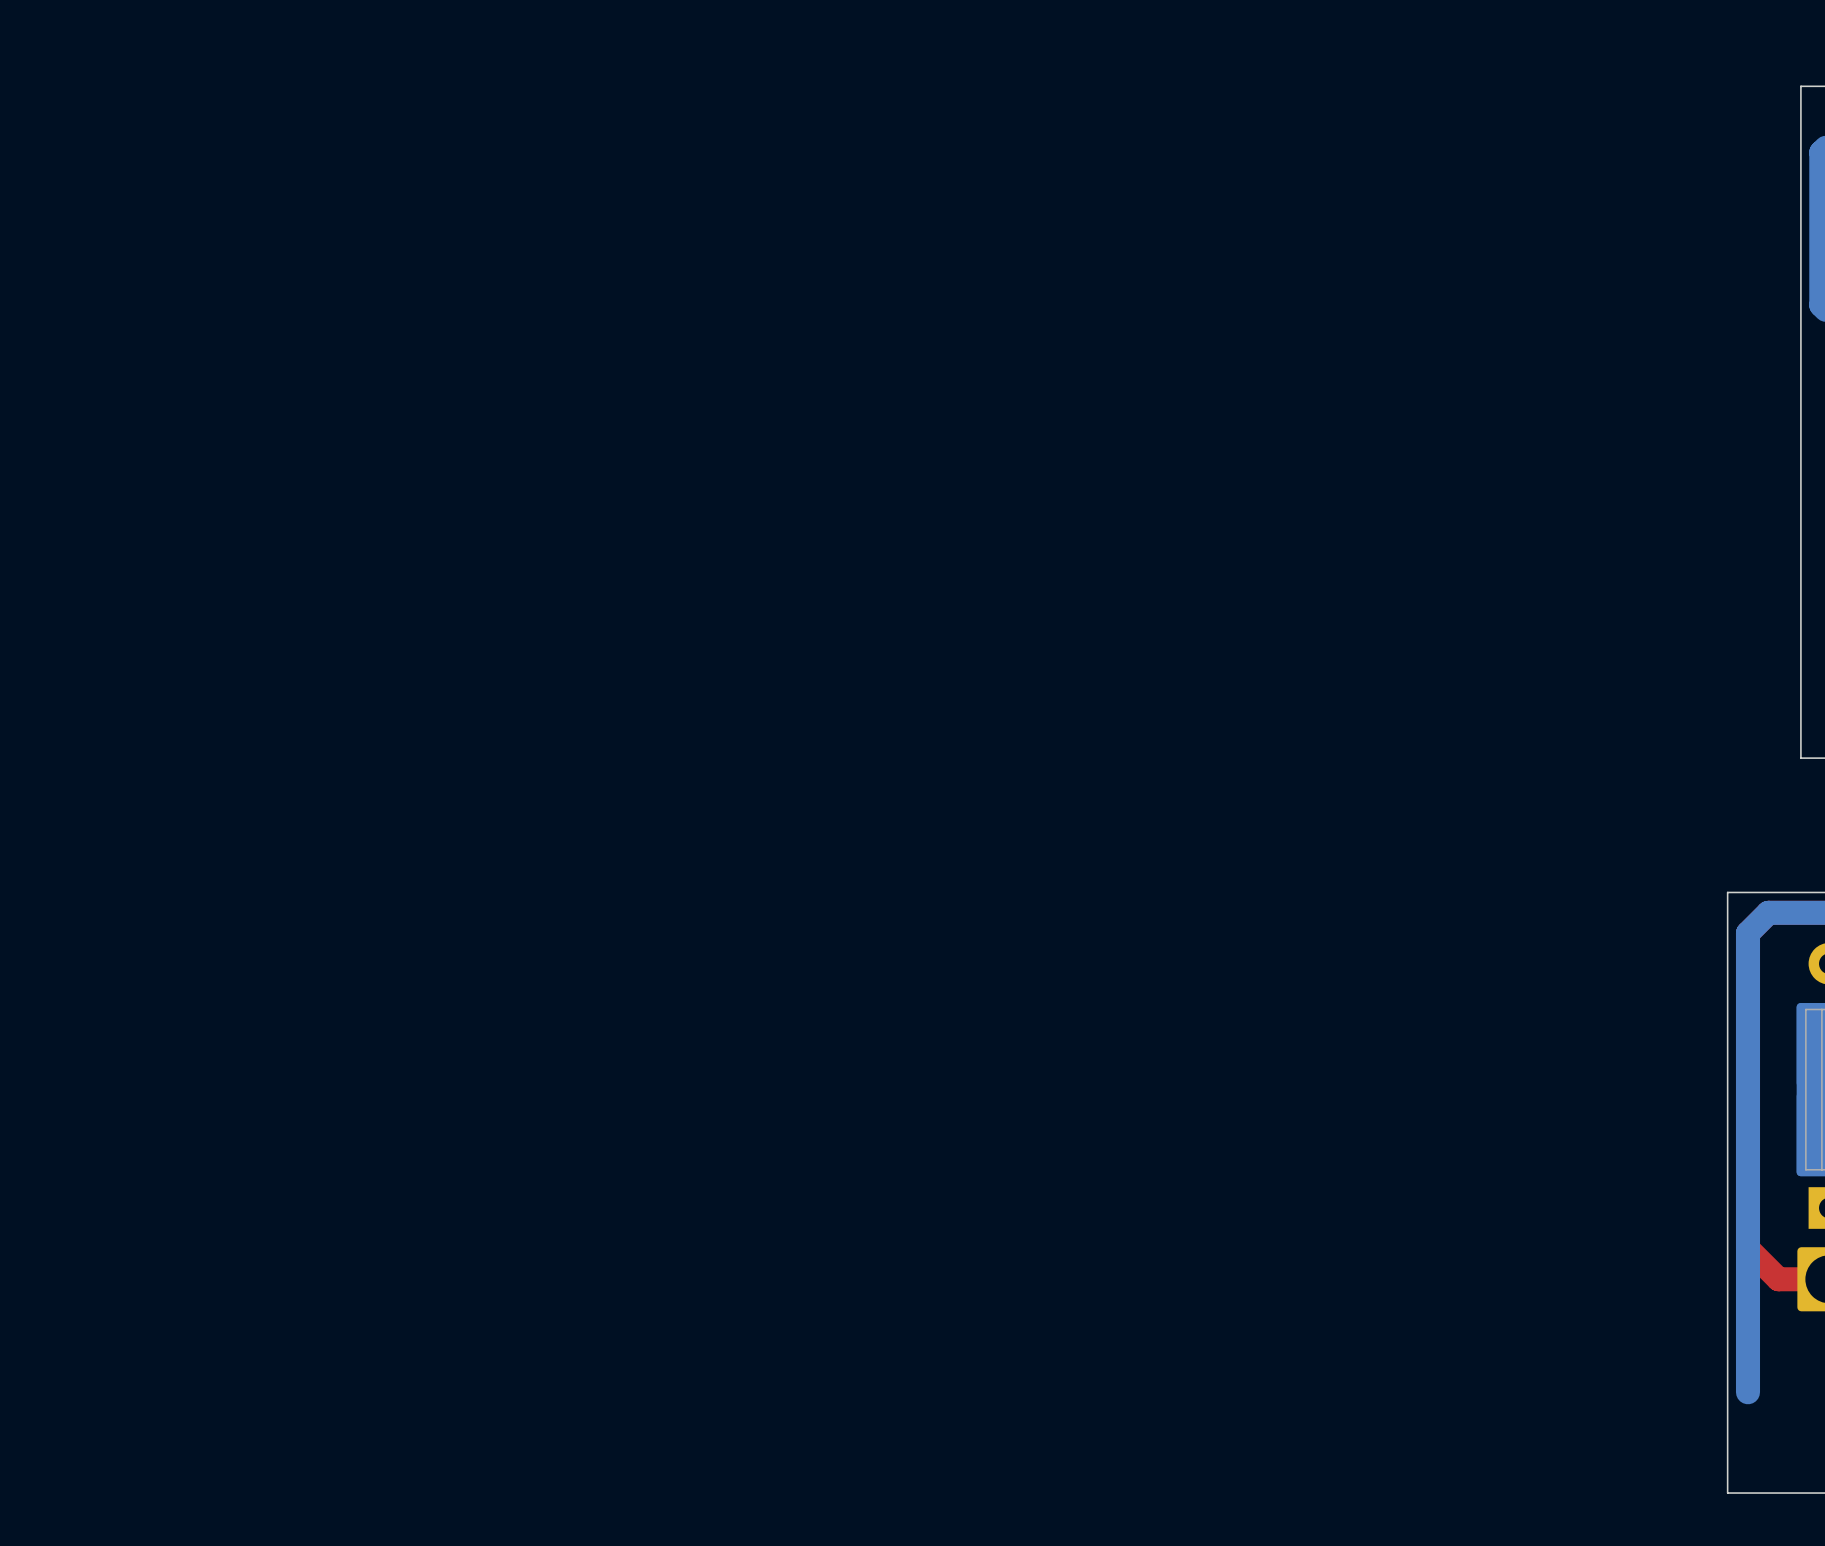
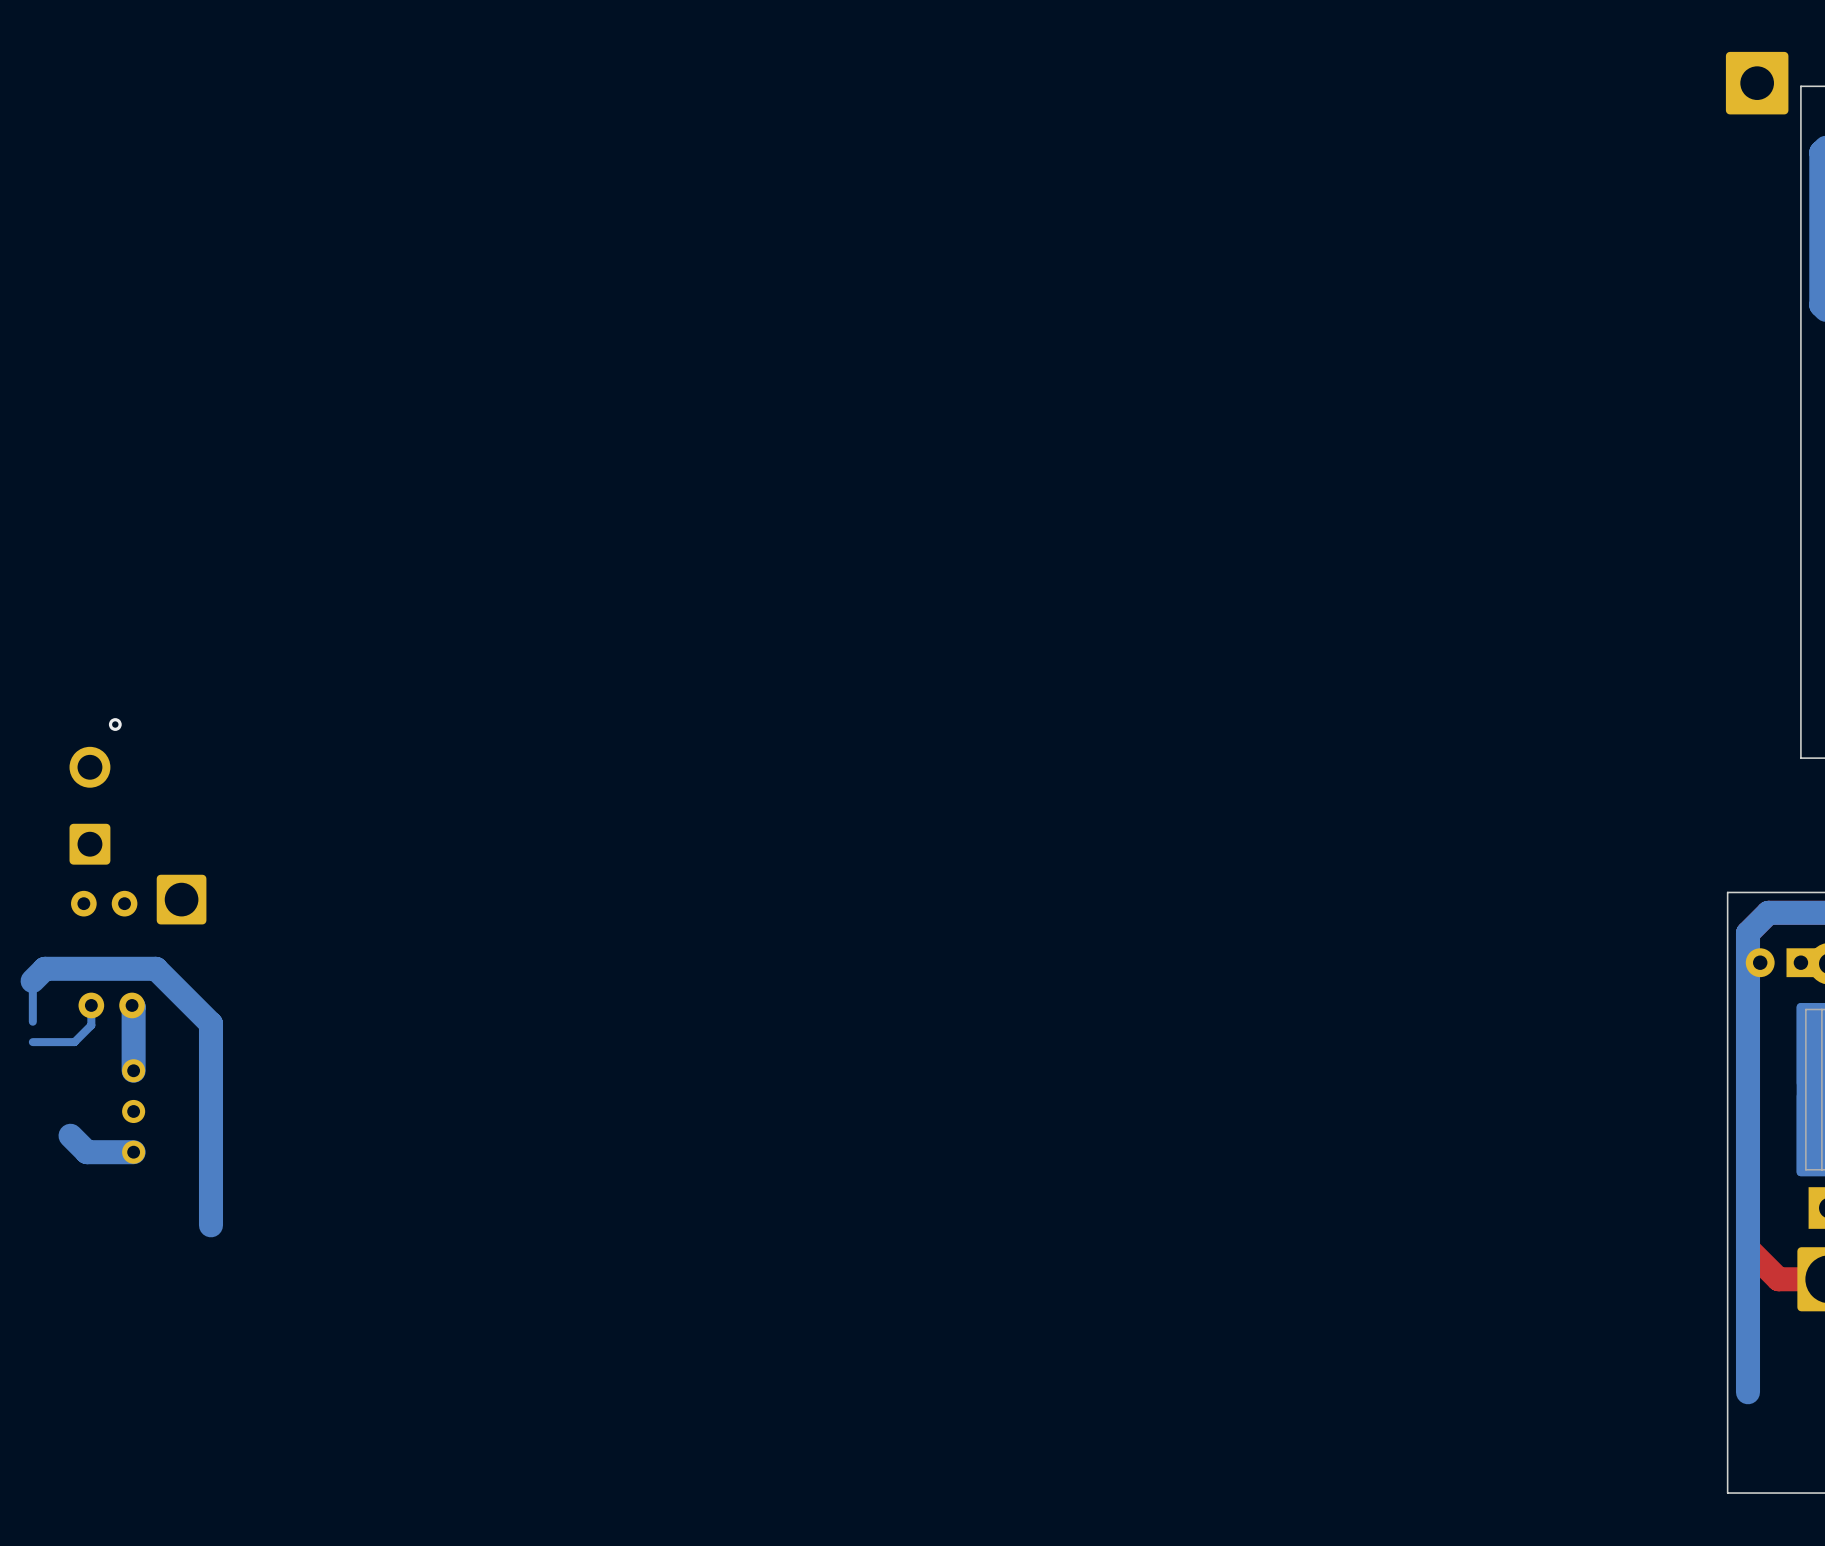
part: none -> (1757, 83)
via: none -> (115, 724)
part: none -> (89, 805)
part: none -> (181, 899)
part: none -> (104, 903)
part: none -> (1780, 962)
bottom track: none -> (91, 1005) (91, 1025) (74, 1042) (32, 1042)
part: none -> (111, 1005)
bottom track: none -> (132, 1005) (133, 1007) (133, 1070)
bottom track: none -> (32, 1021) (32, 981) (44, 968) (156, 968) (210, 1023) (210, 1225)
part: none -> (133, 1111)
bottom track: none -> (72, 1133) (70, 1135) (86, 1152) (133, 1152)

